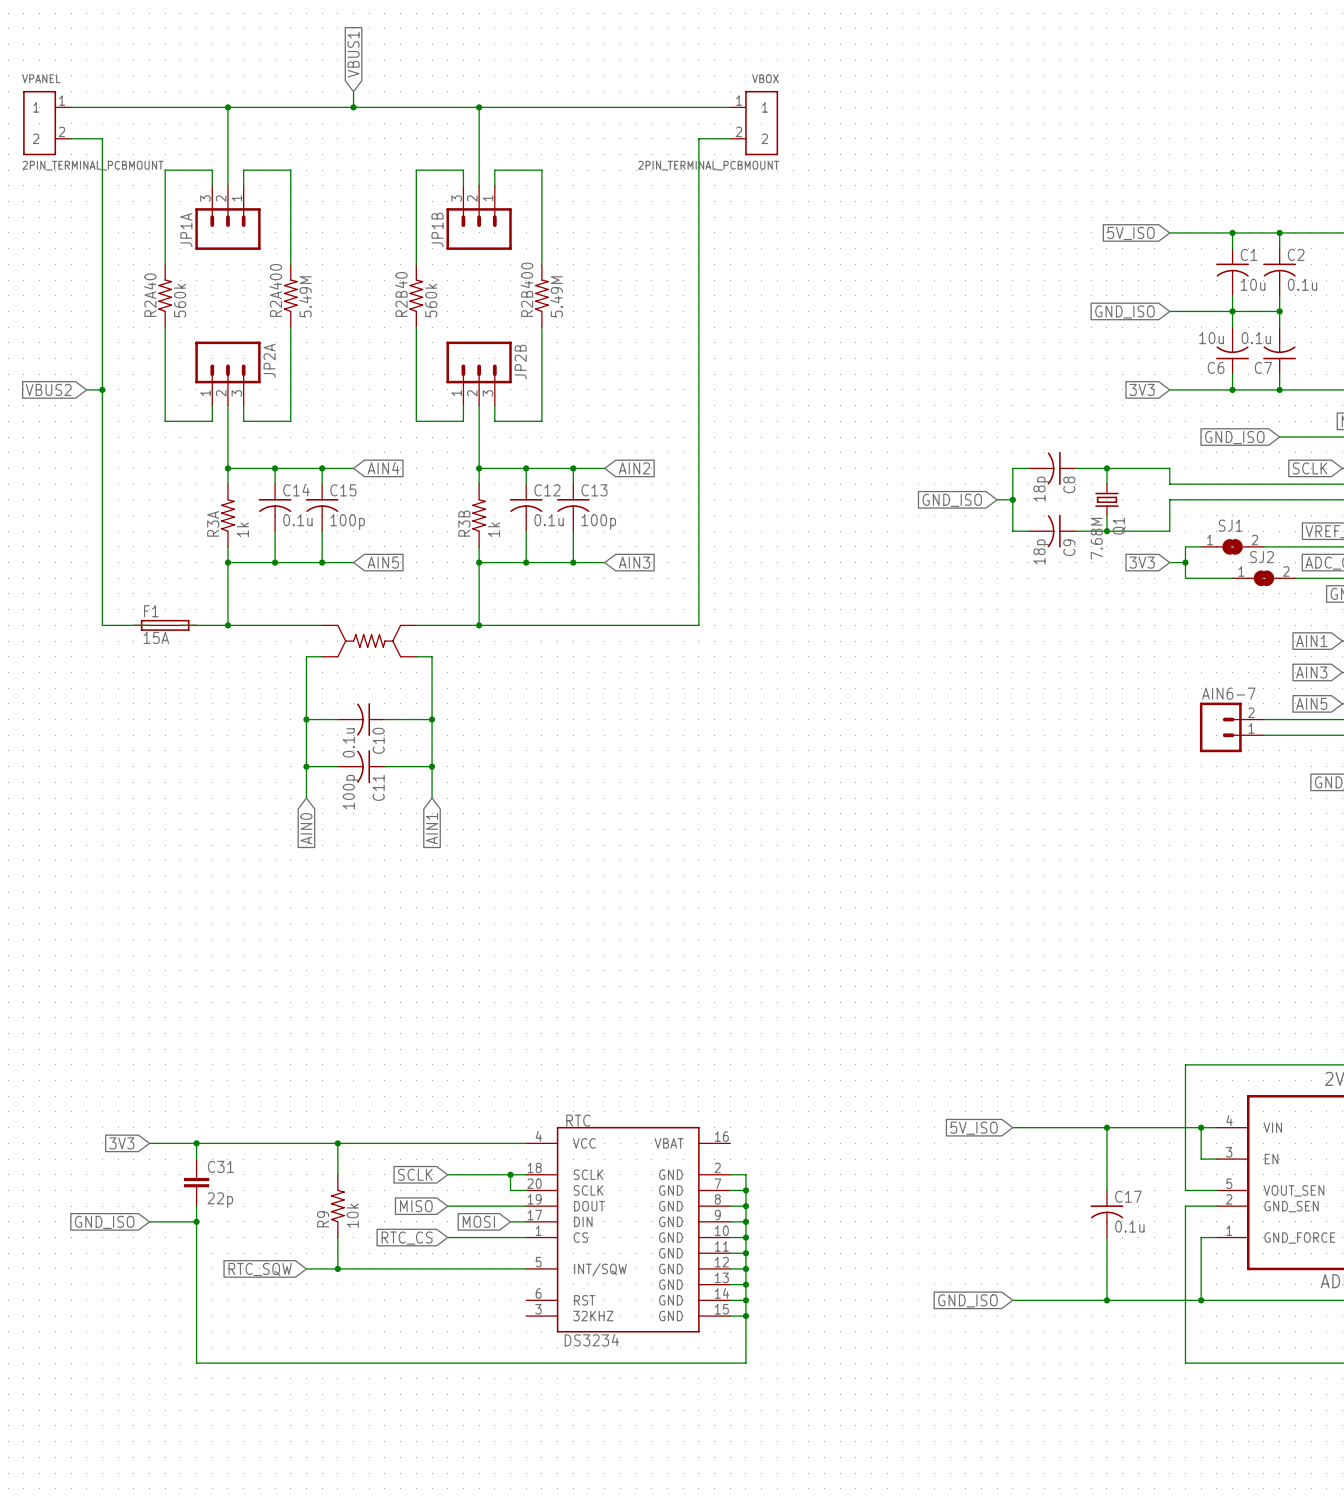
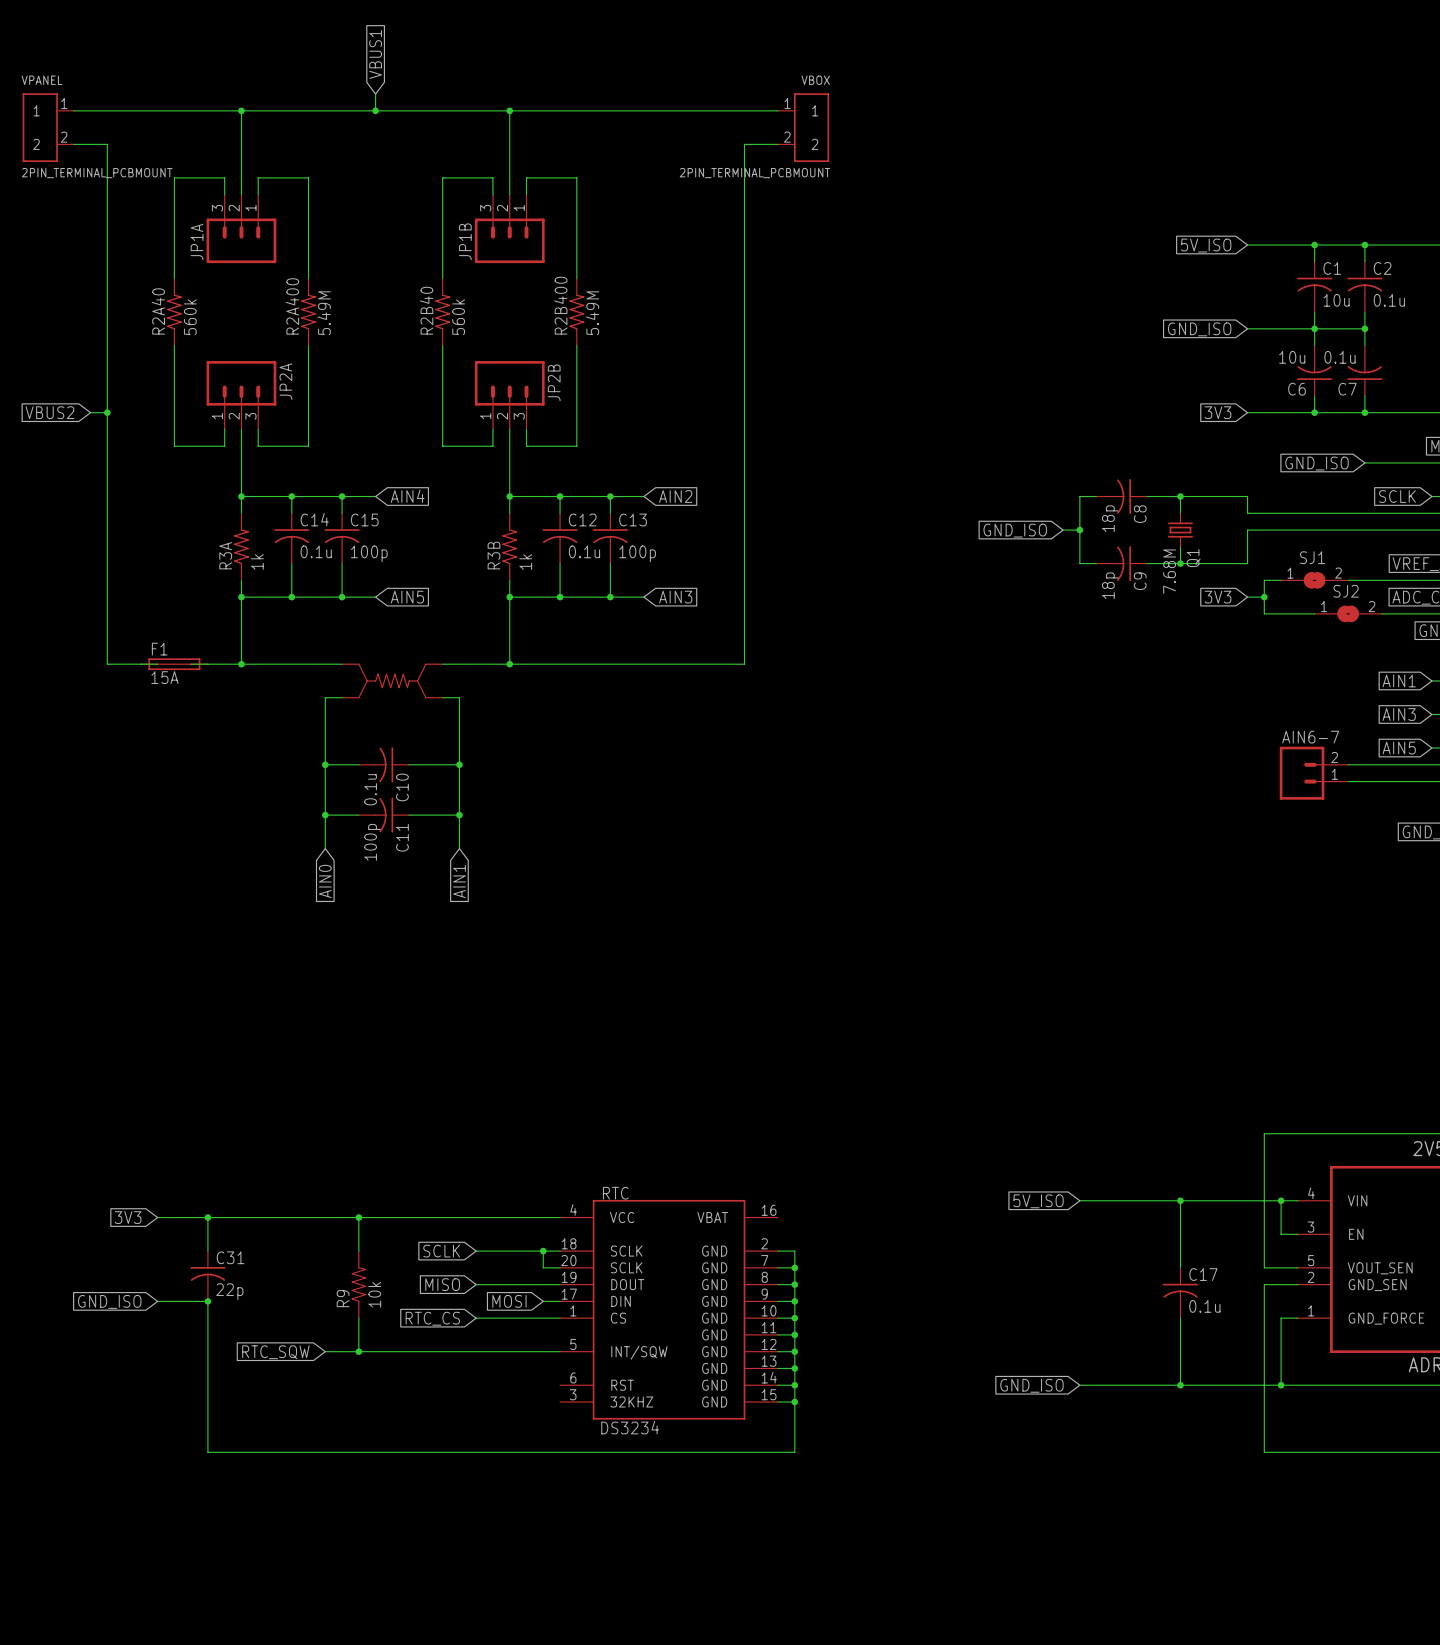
C31 symbol: [184, 1159, 210, 1207] -> [190, 1251, 226, 1302]

